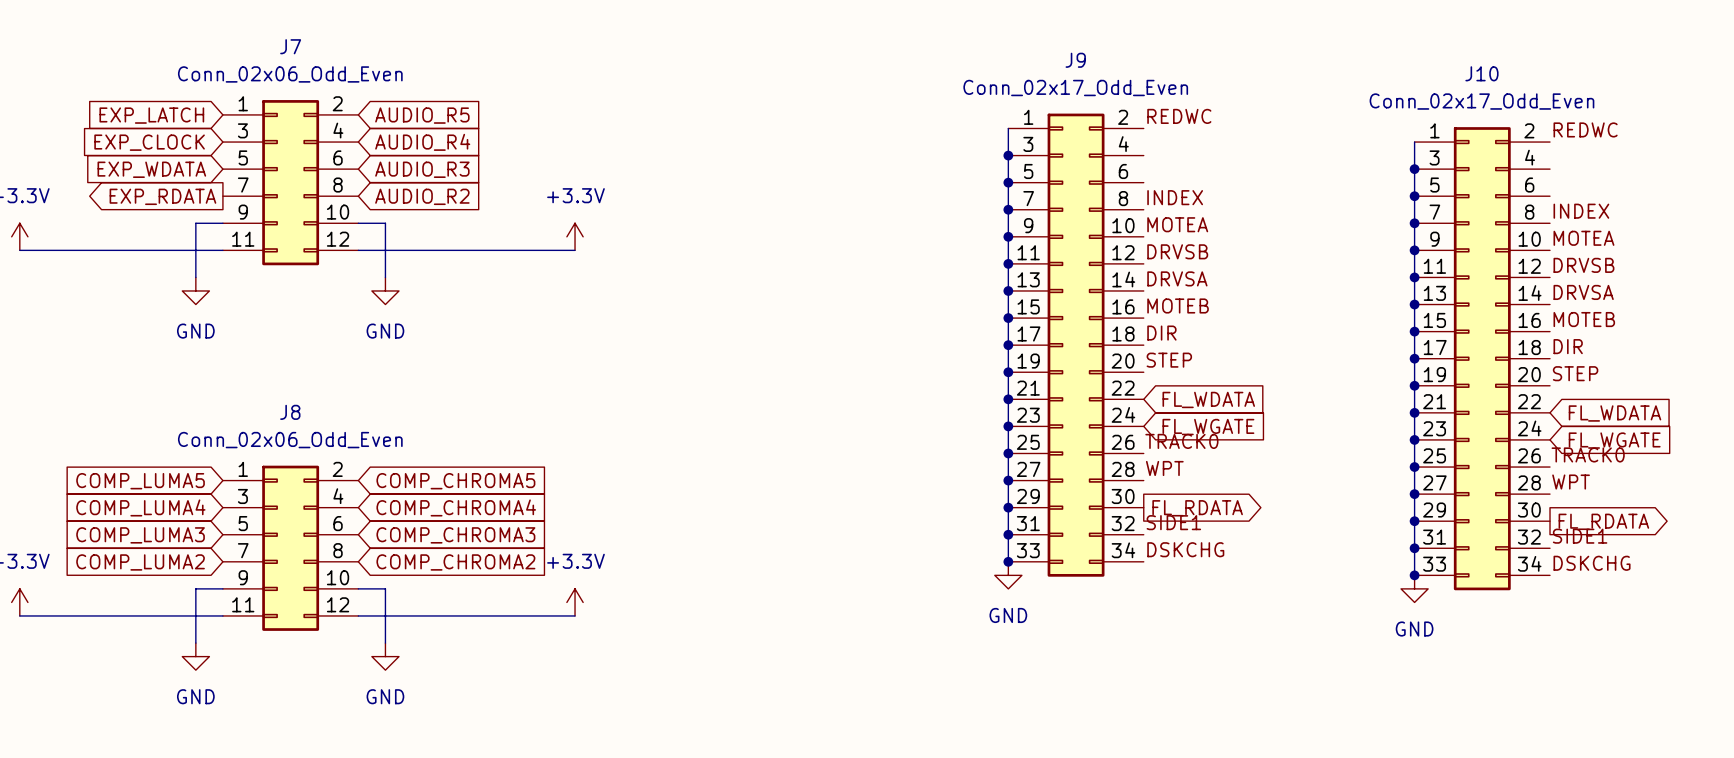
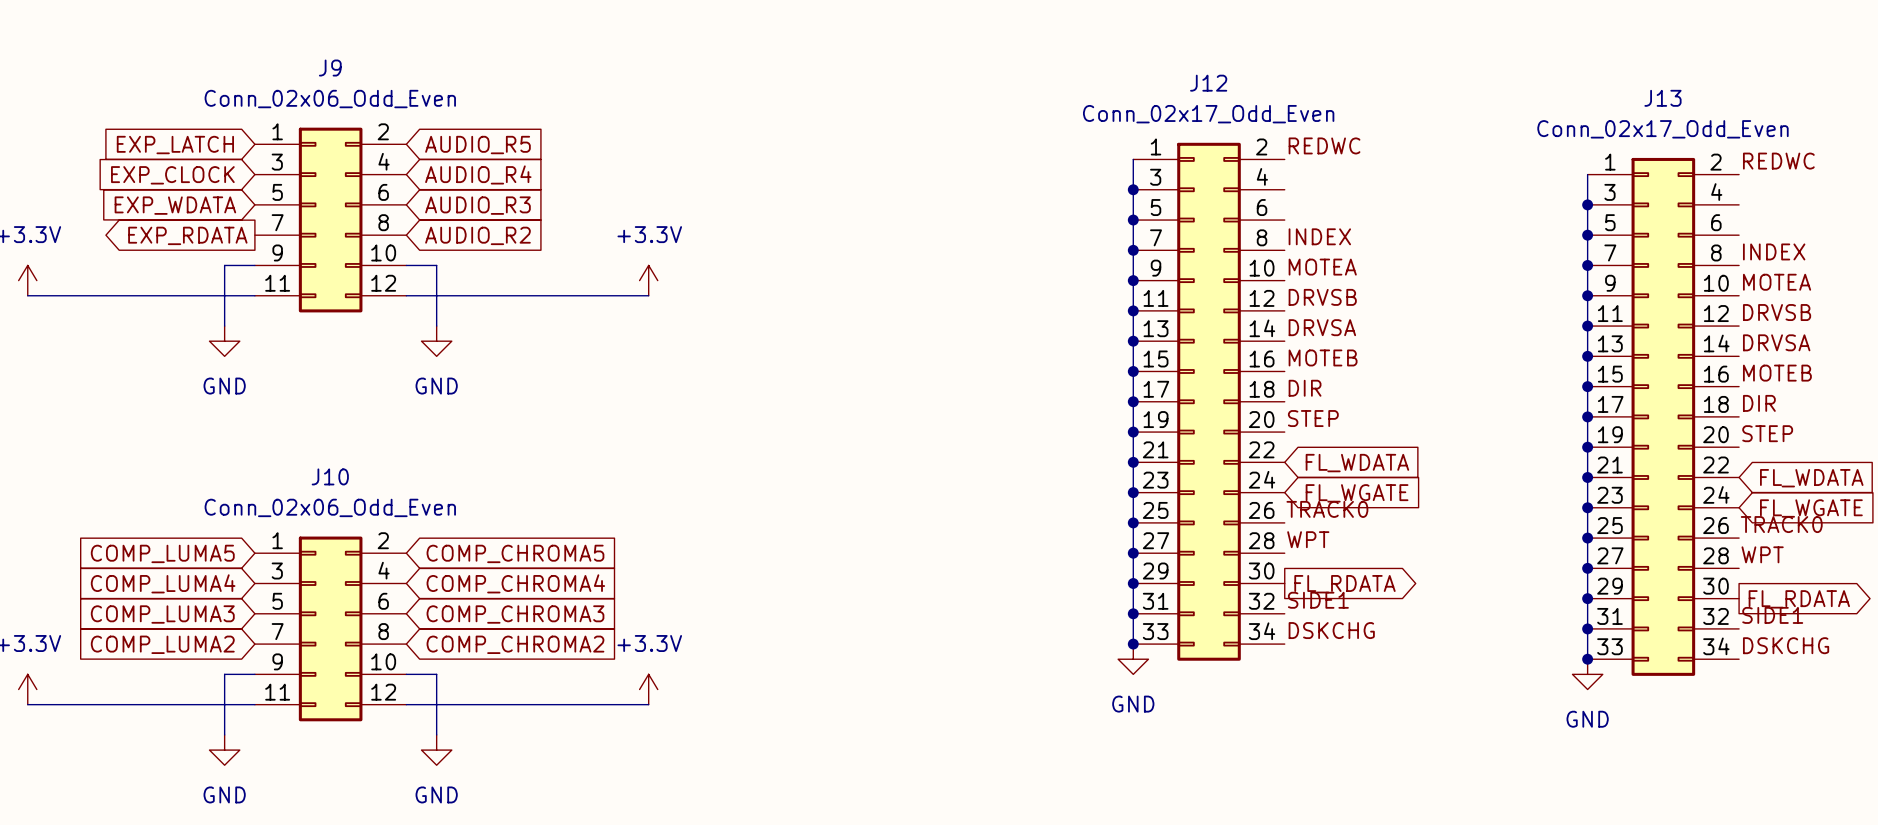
J7 name: J7 (290, 46) -> J9 (330, 68)
J9 name: J9 (1075, 60) -> J12 (1208, 83)
J10 name: J10 (1481, 73) -> J13 (1662, 98)
J8 name: J8 (290, 412) -> J10 (330, 476)

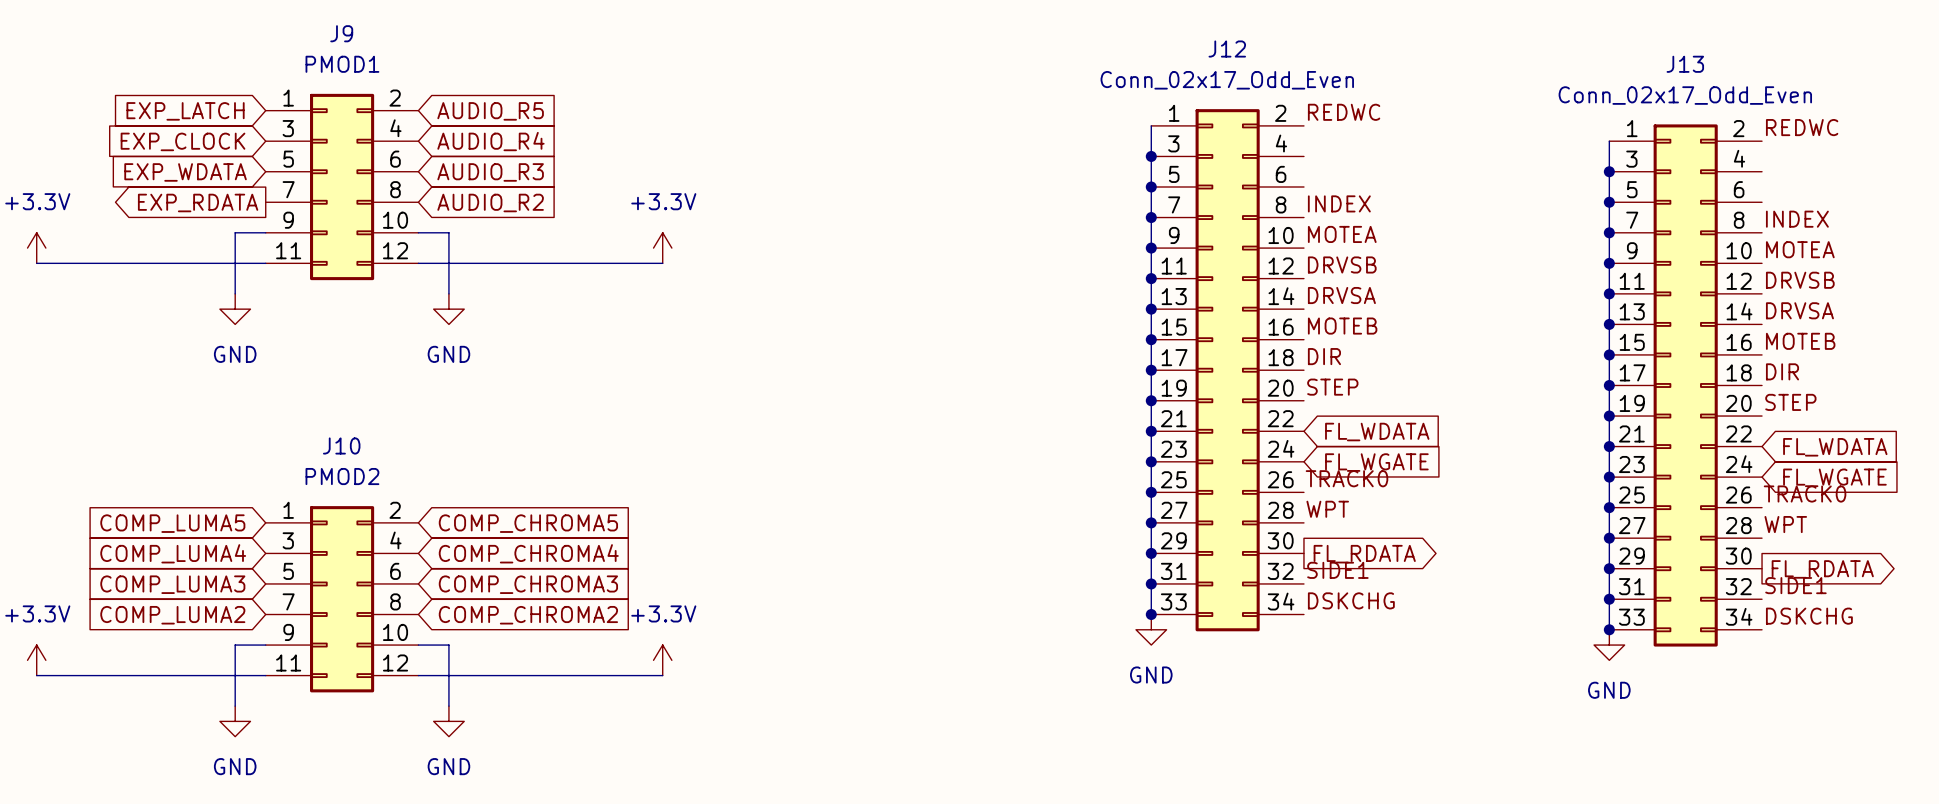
J9 value: Conn_02x06_Odd_Even (330, 99) -> PMOD1 (342, 64)
J10 value: Conn_02x06_Odd_Even (330, 507) -> PMOD2 (342, 476)

